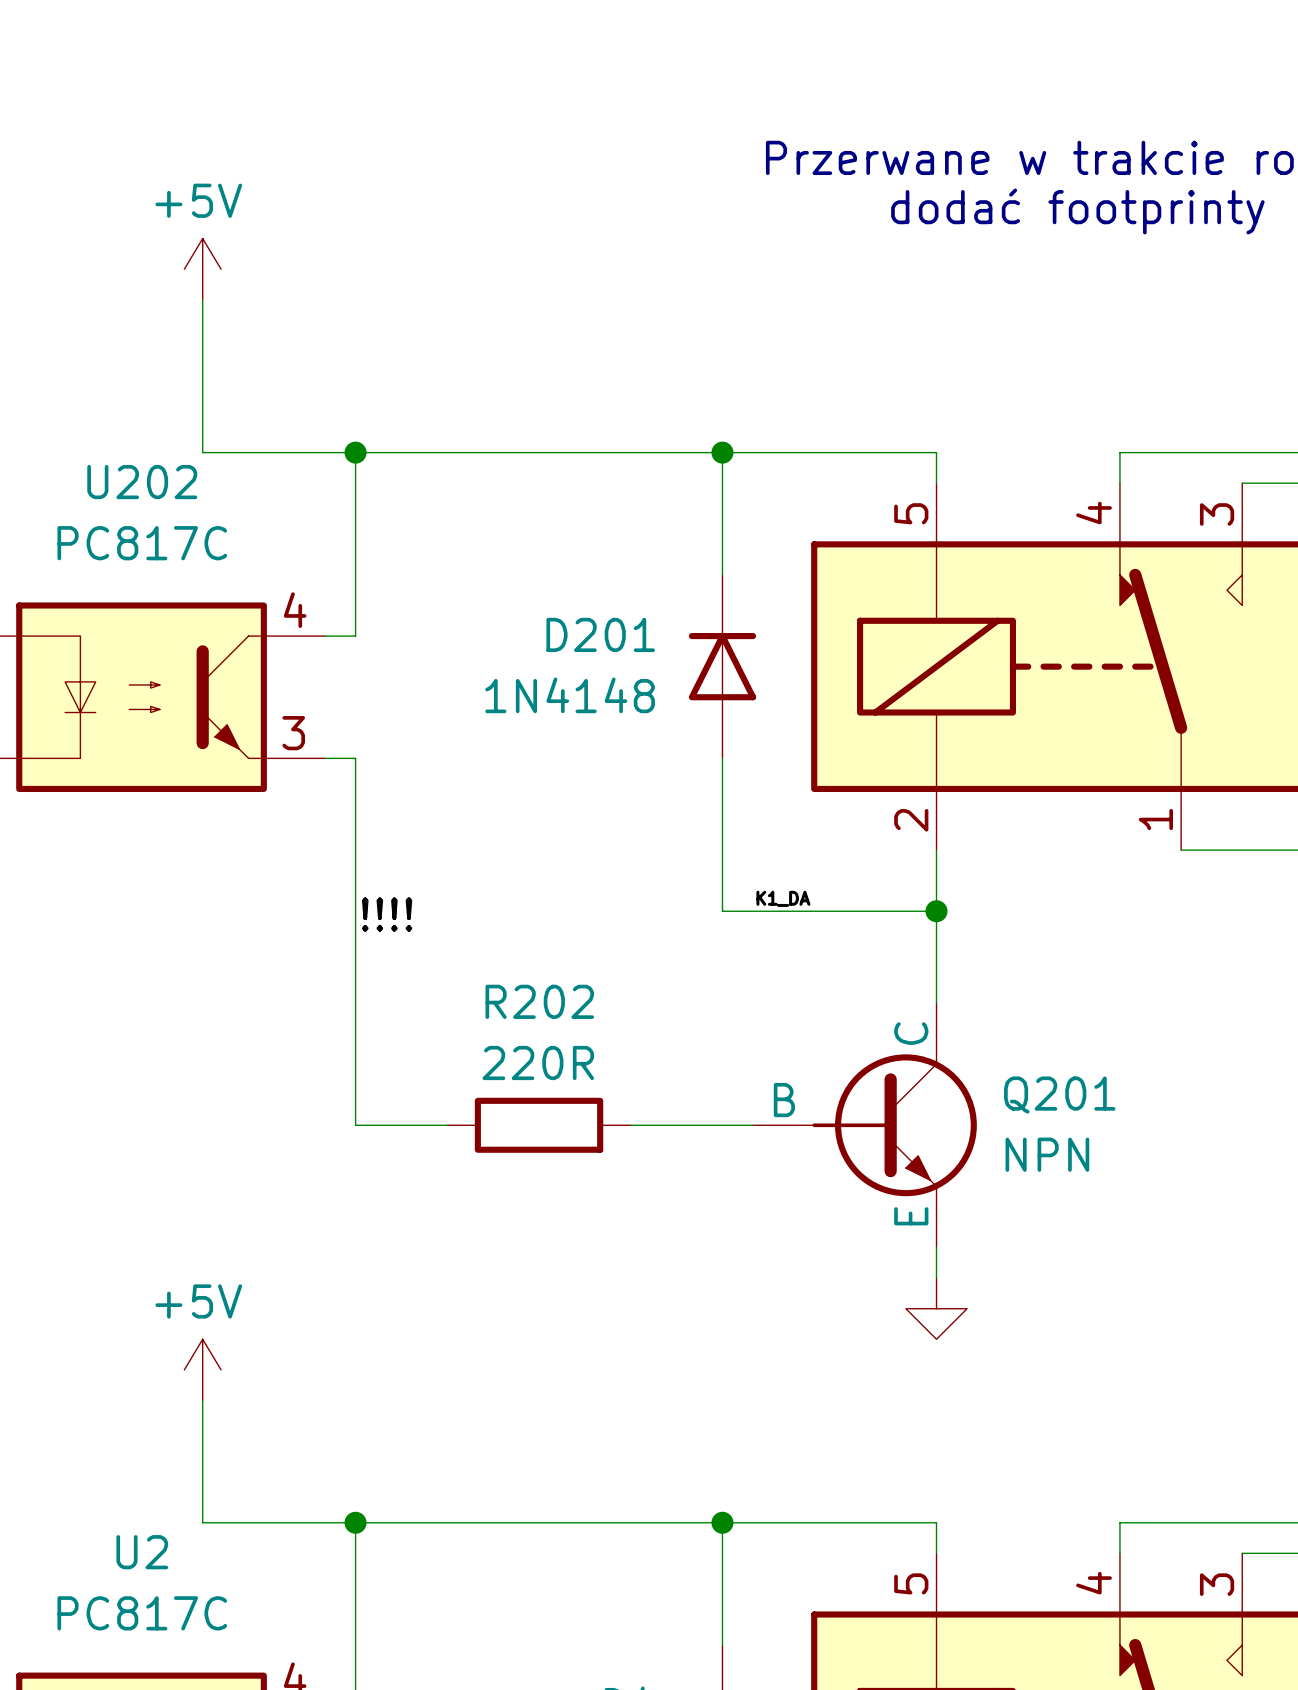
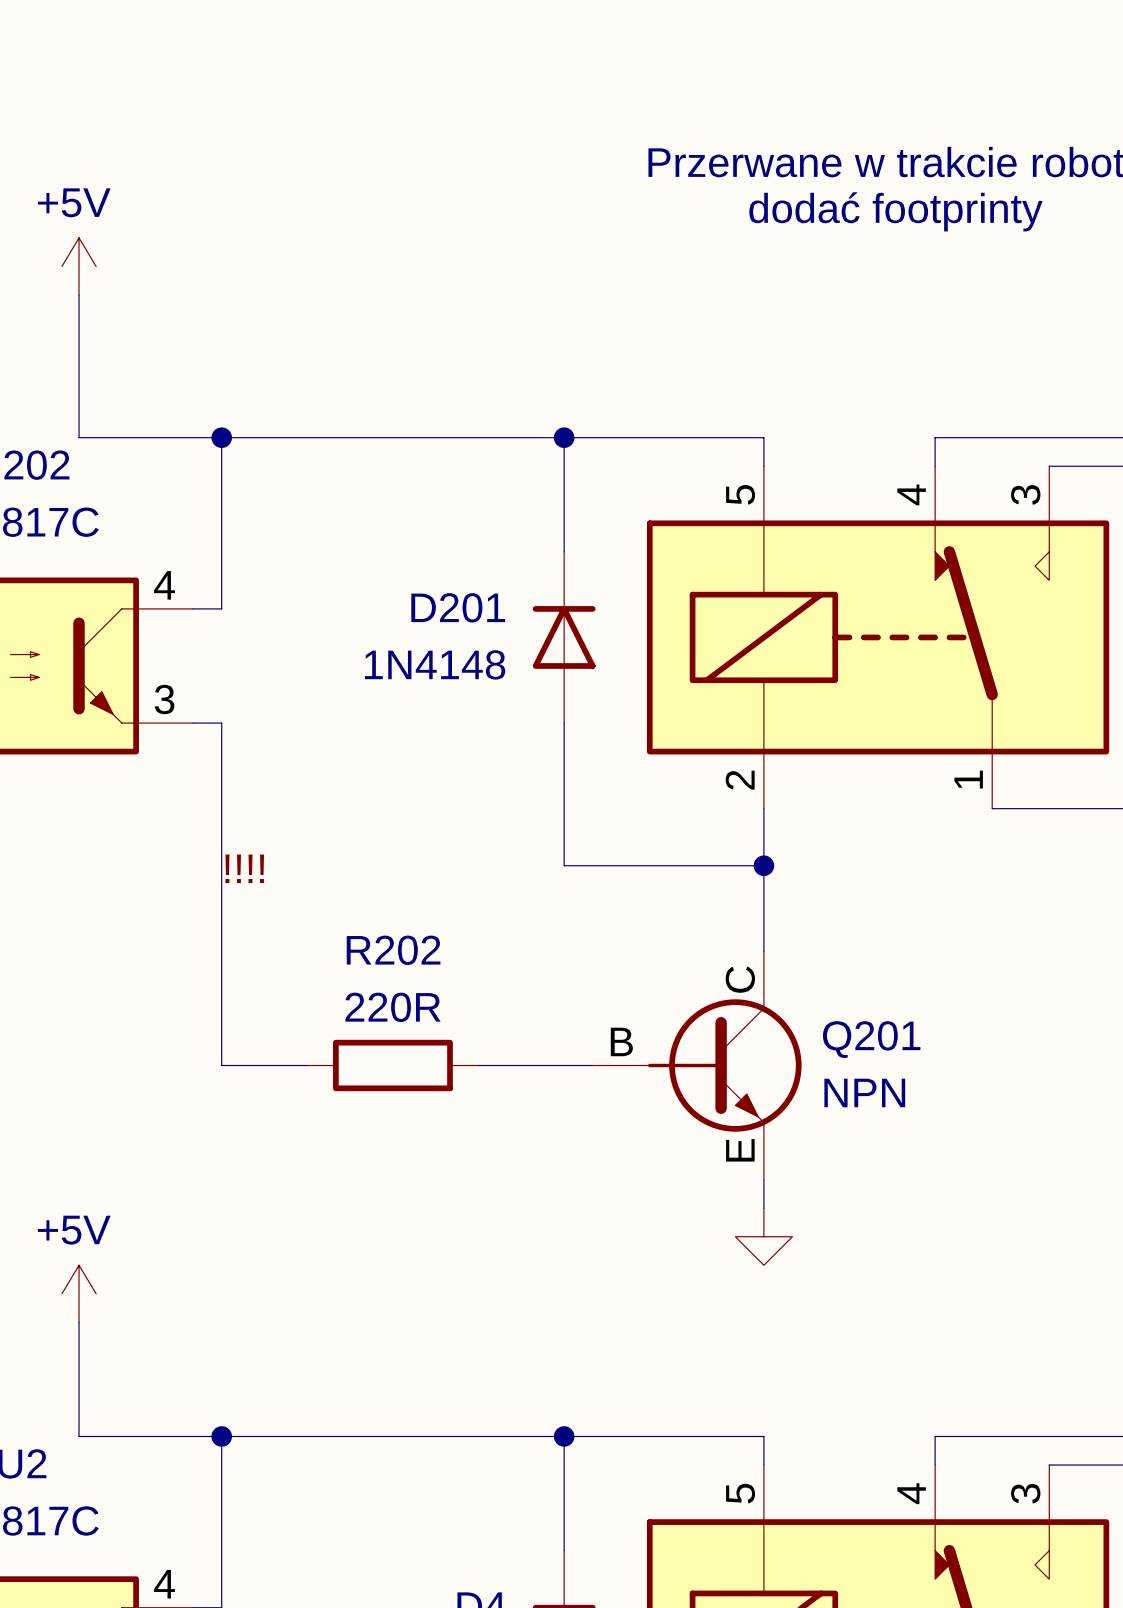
label: K1_DA (783, 898) -> none

